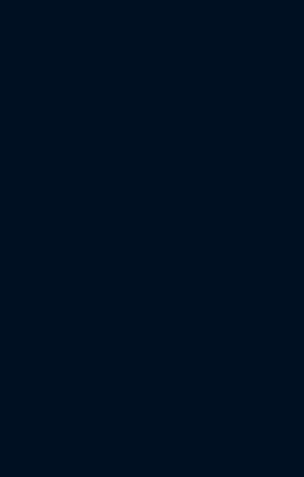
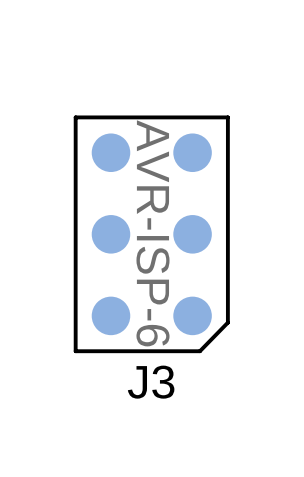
J3: none -> AVR-ISP-6 (151, 234)

